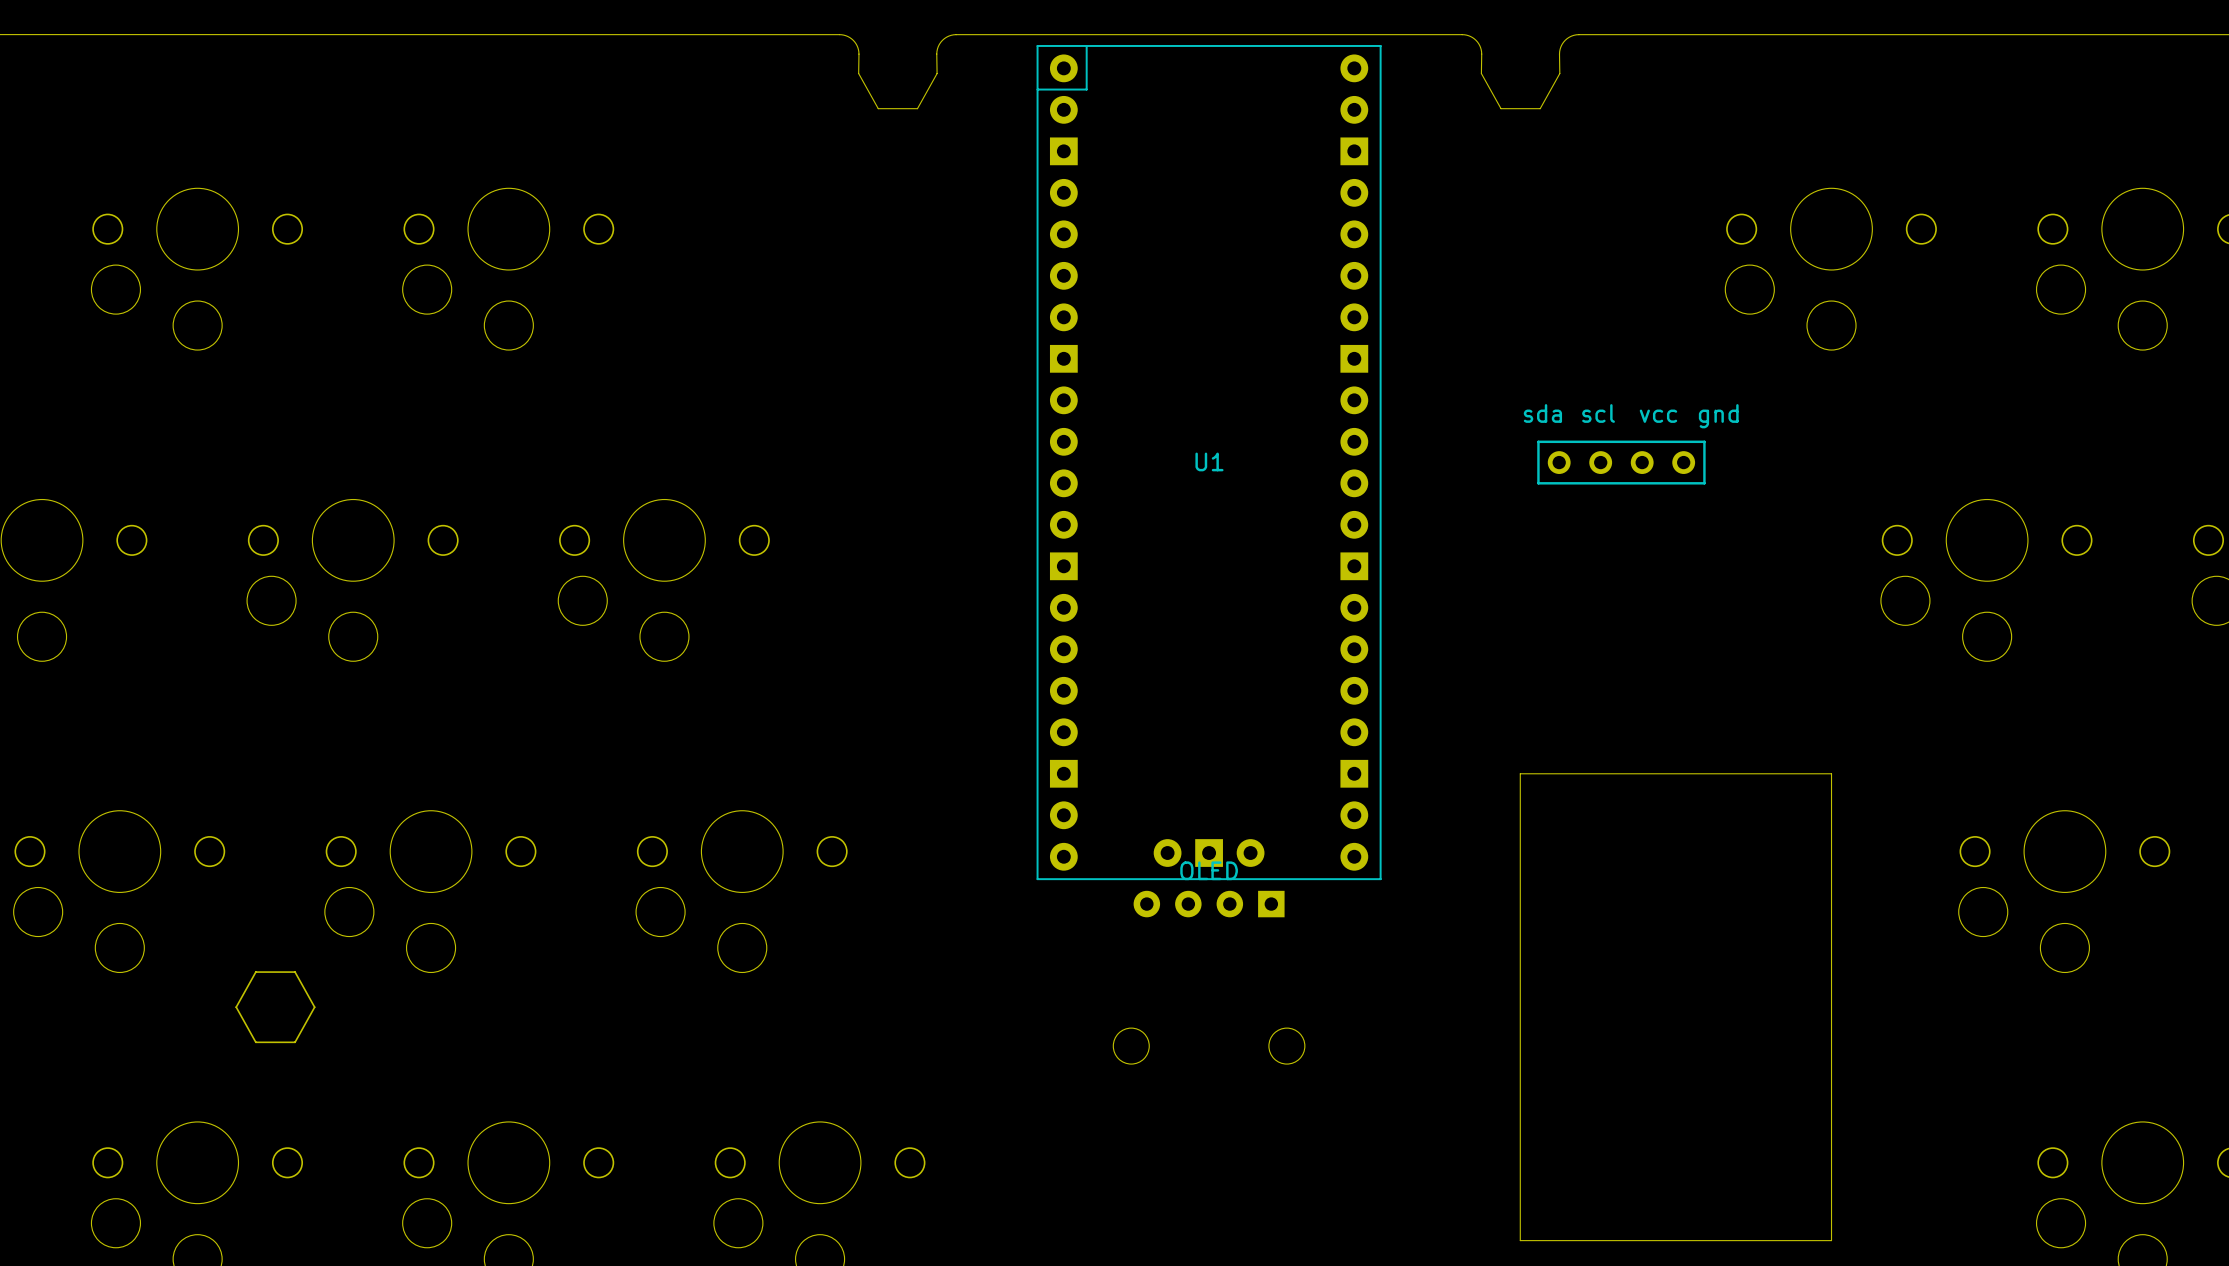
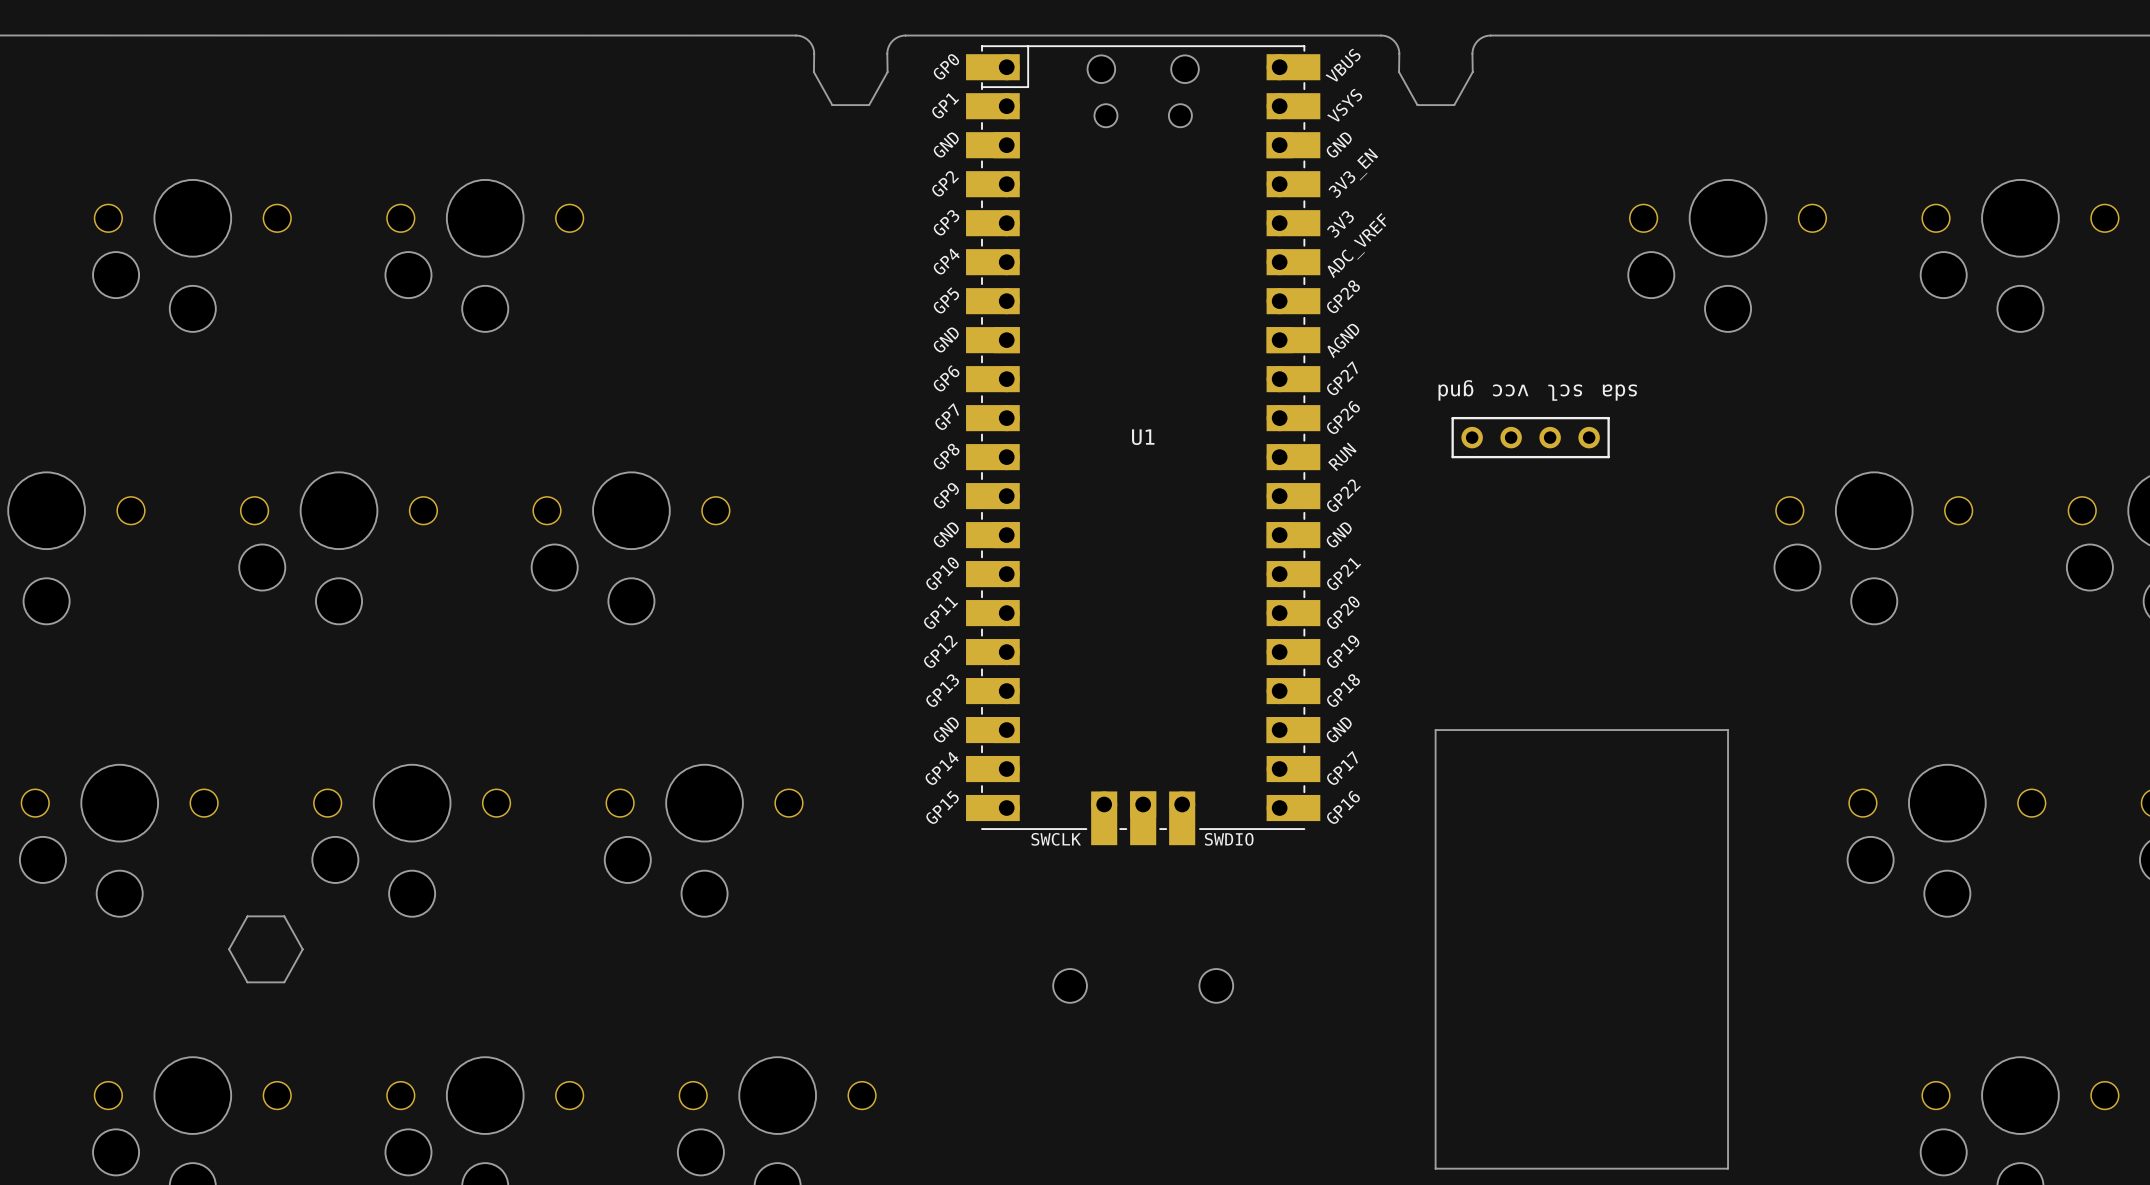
U1 footprint: [1036, 44, 1382, 881] -> [966, 45, 1321, 846]
text rotation: 0° (1542, 413) -> 180° (1619, 392)
text position: sda (1542, 413) -> sda (1619, 392)
text rotation: 0° (1598, 413) -> 180° (1565, 392)
text rotation: 0° (1658, 416) -> 180° (1510, 390)
text position: vcc (1658, 416) -> vcc (1510, 390)
text rotation: 0° (1718, 416) -> 180° (1455, 390)
text position: gnd (1718, 416) -> gnd (1455, 390)
part: (1209, 904) -> none

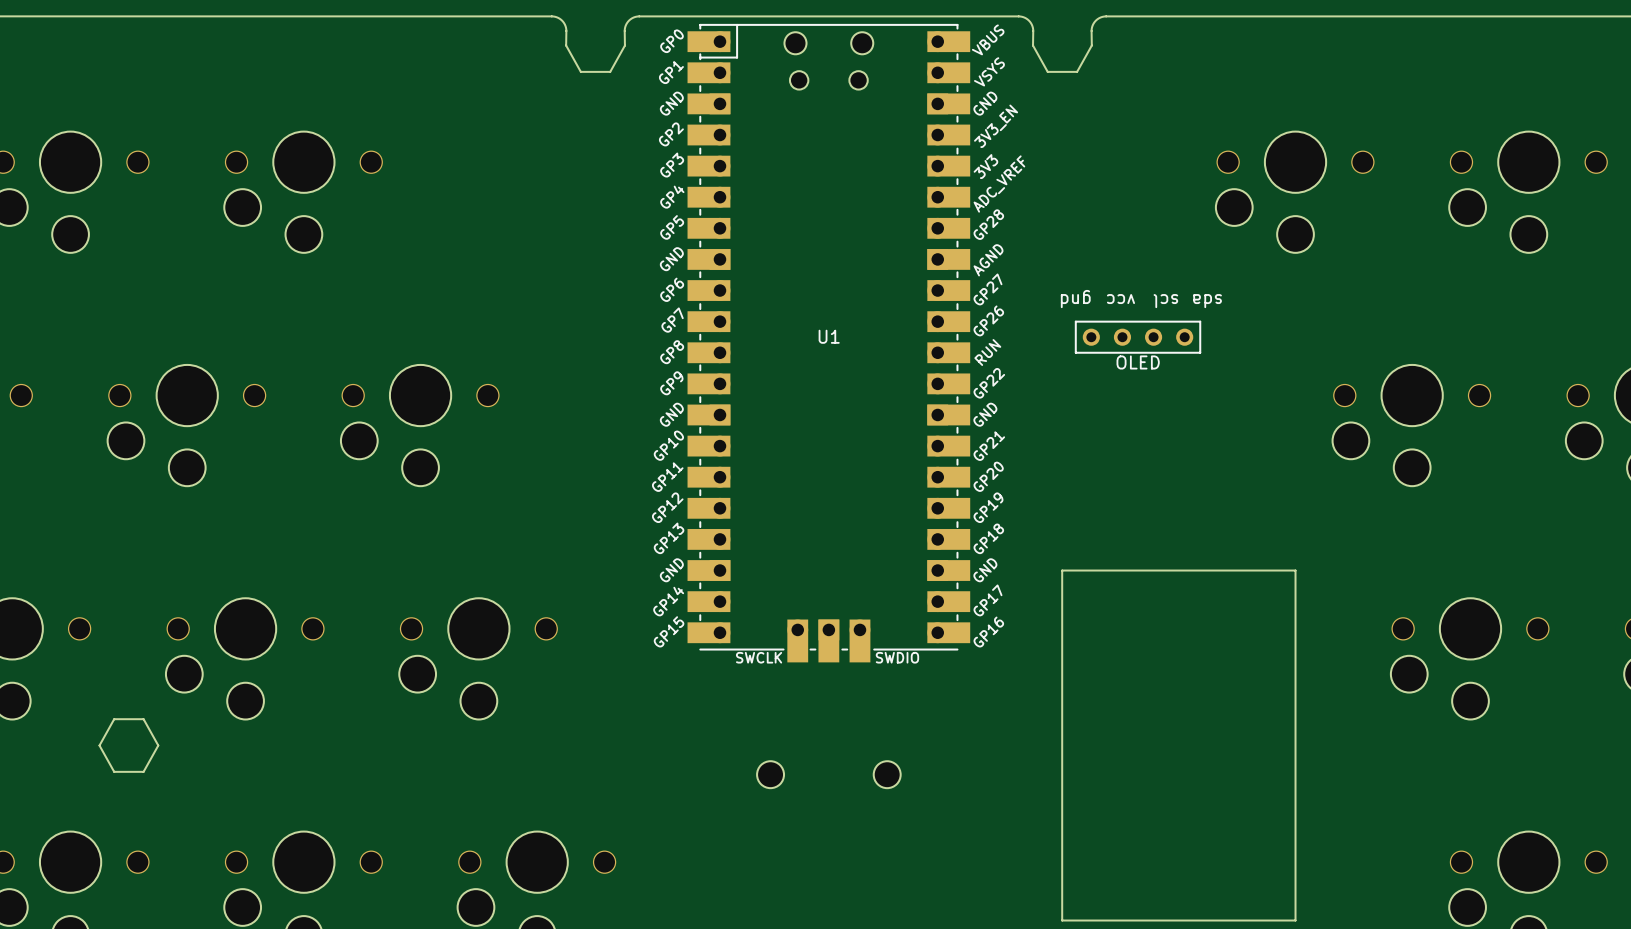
part text: none -> OLED (1138, 362)

